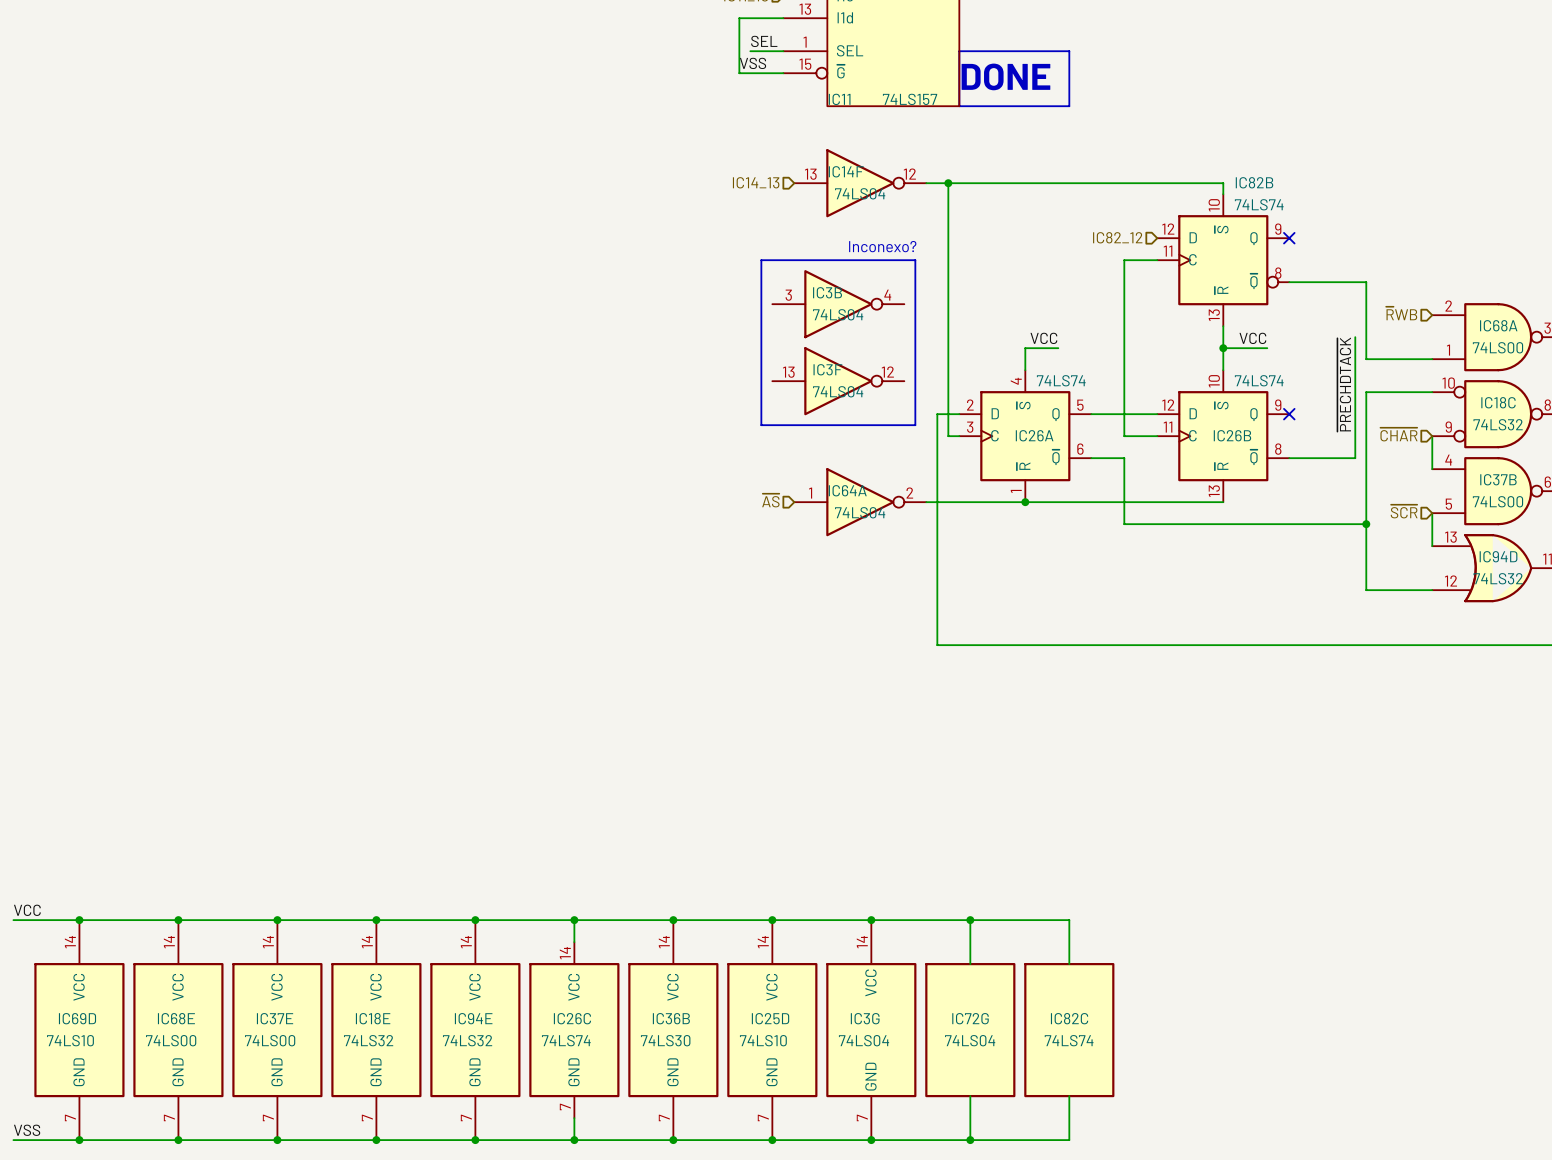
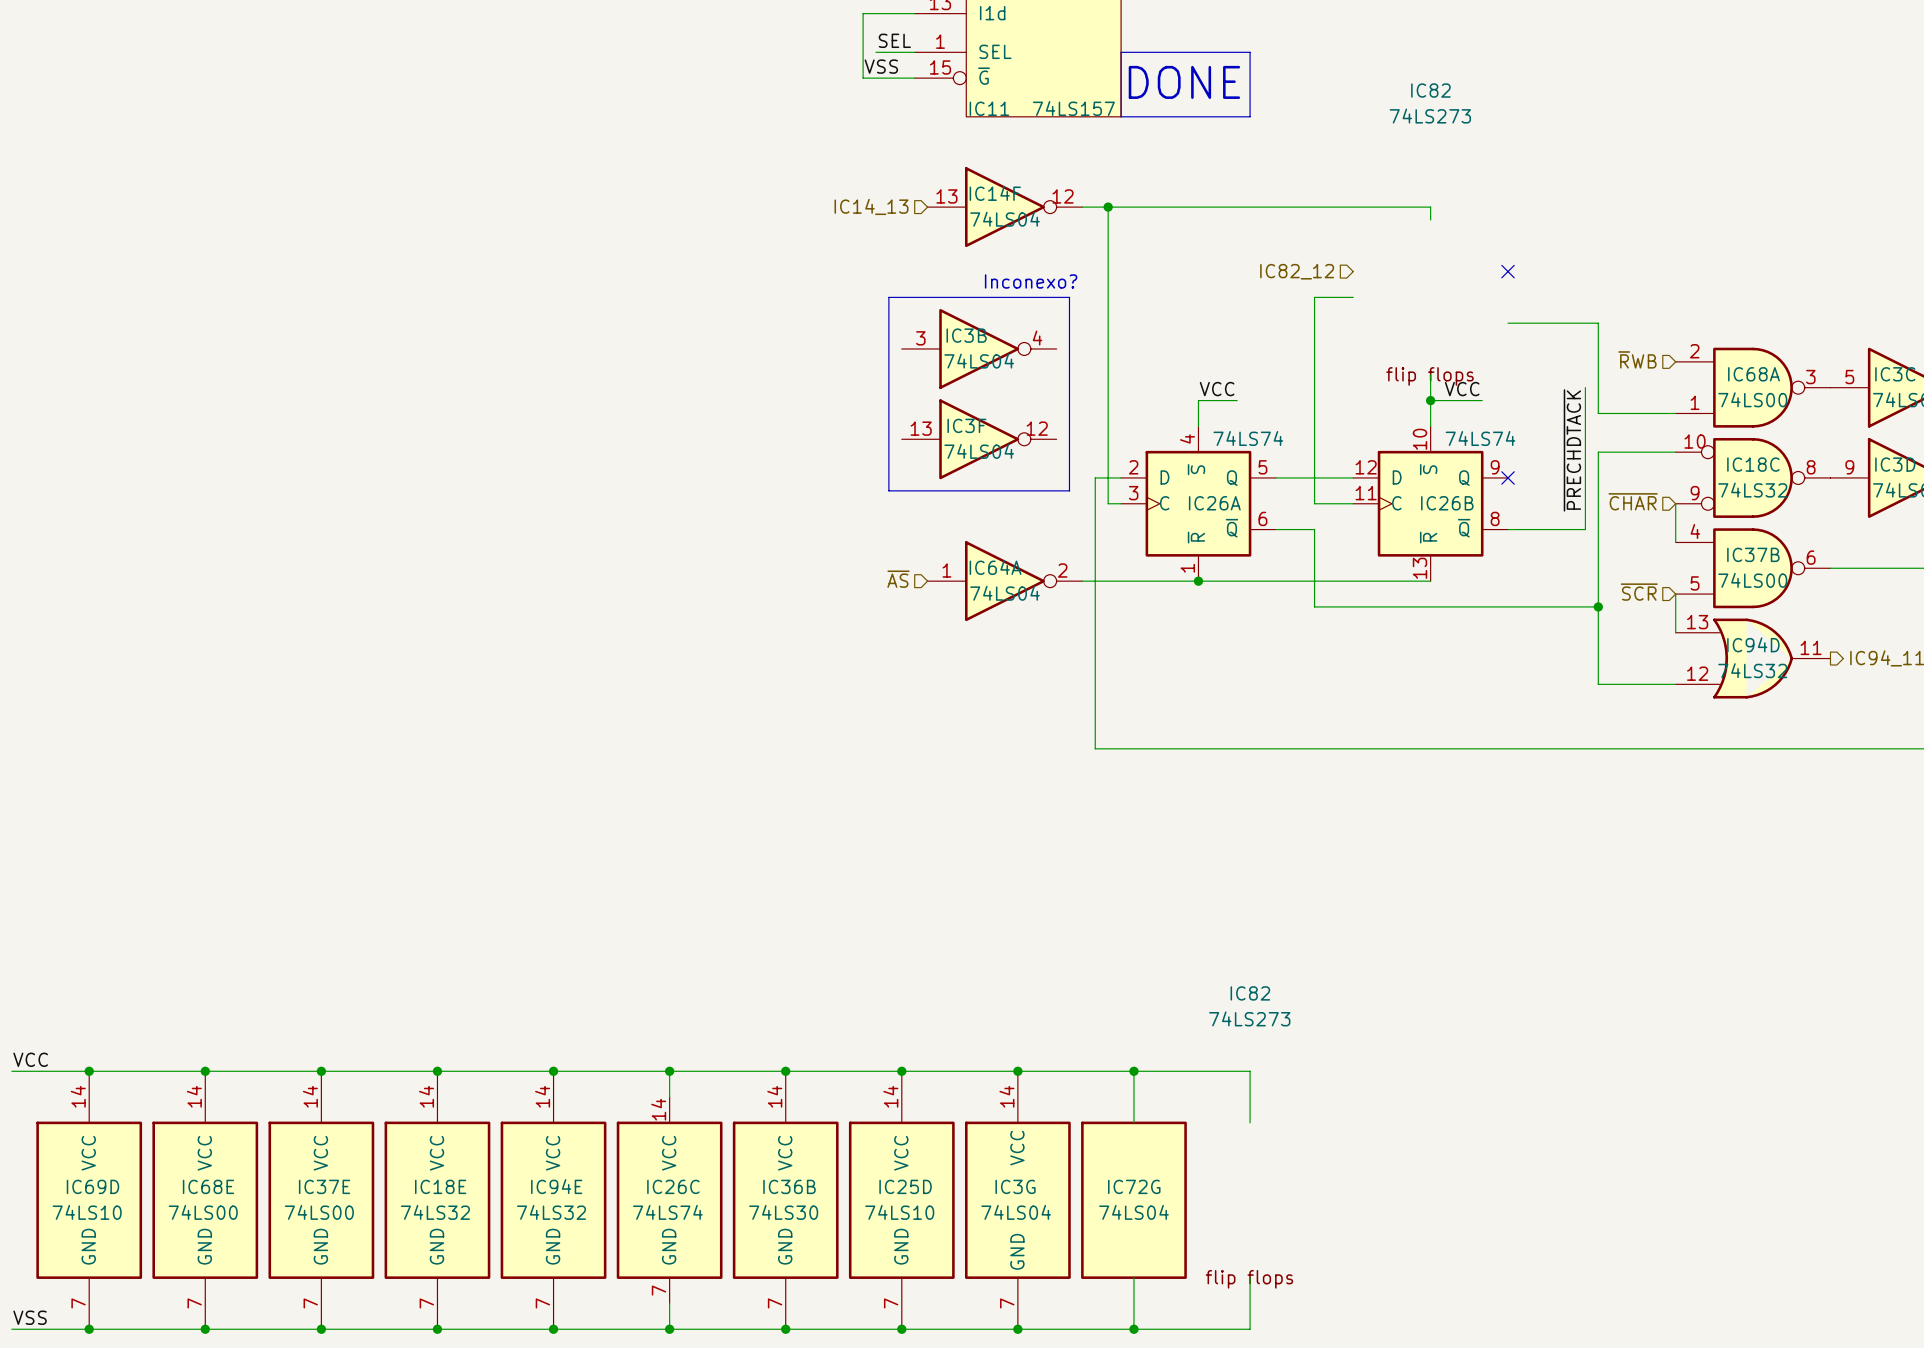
IC82: none -> 74LS273 (1430, 234)
IC82B: 74LS74 (1223, 260) -> none
IC82: none -> 74LS273 (1249, 1137)
IC82C: 74LS74 (1069, 1030) -> none

